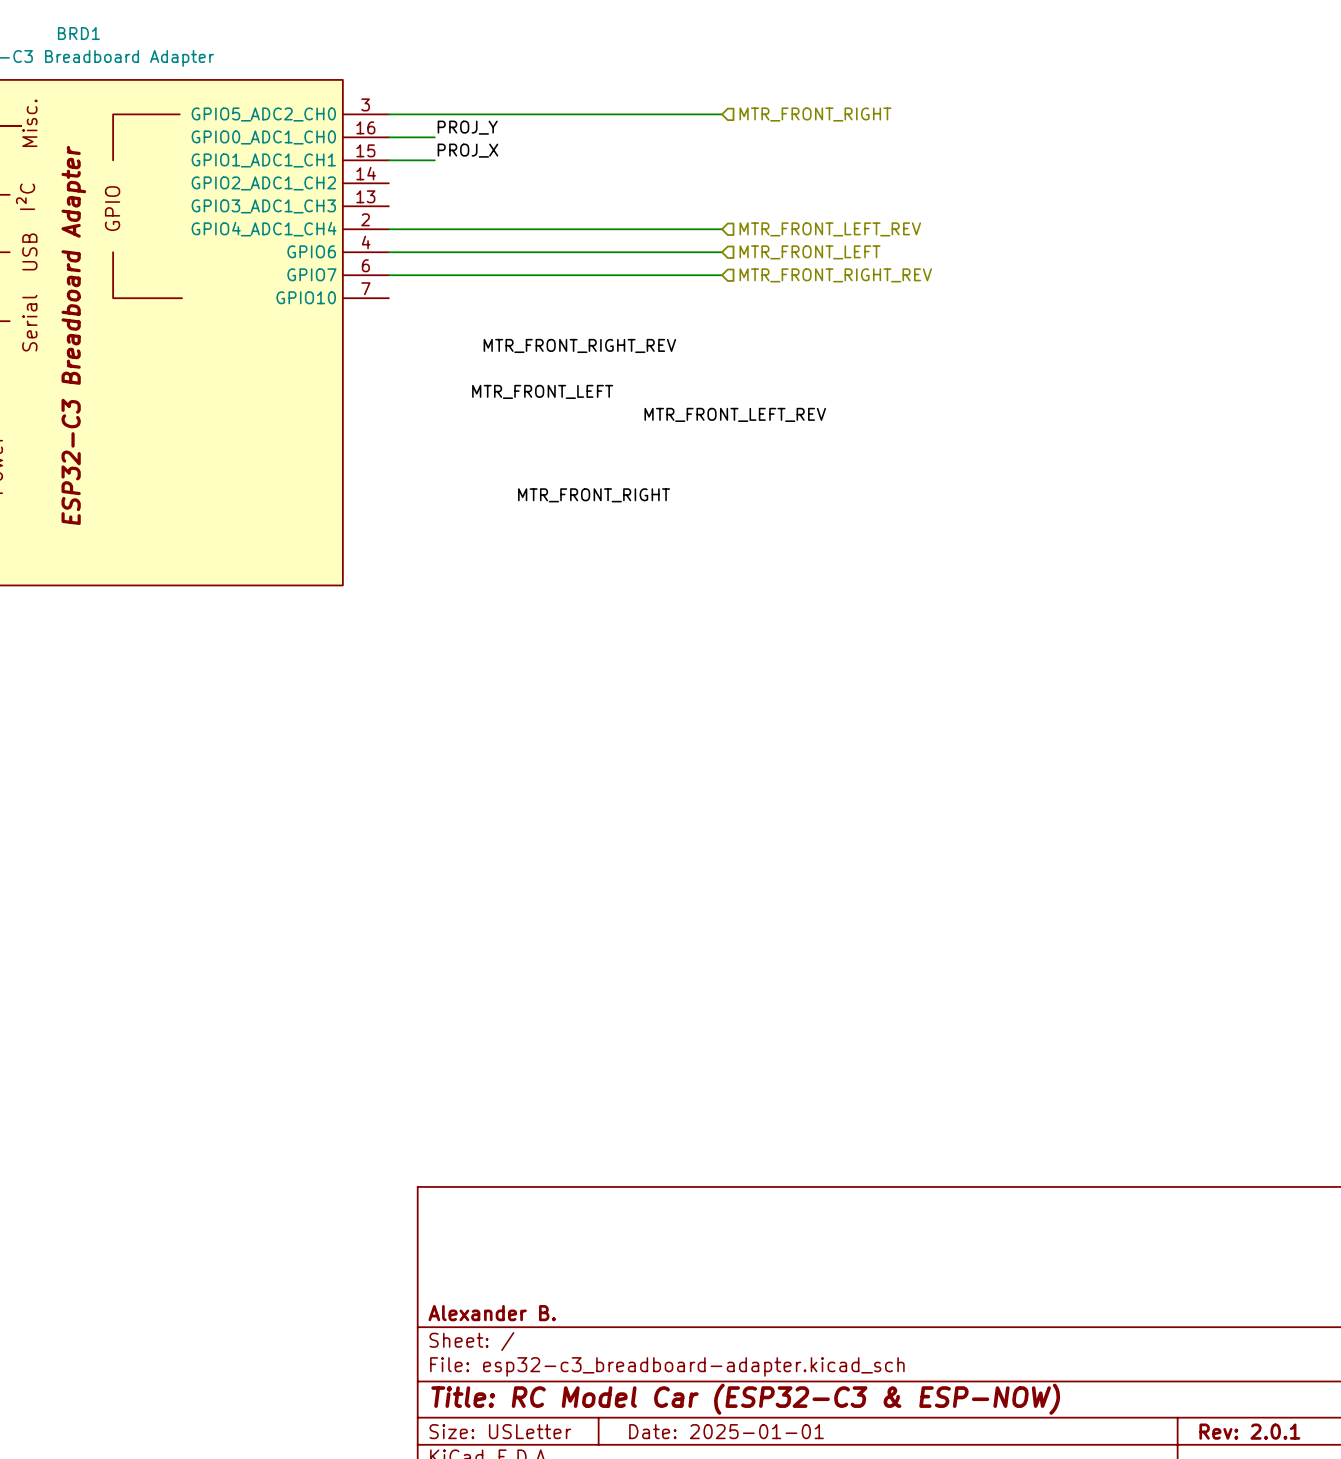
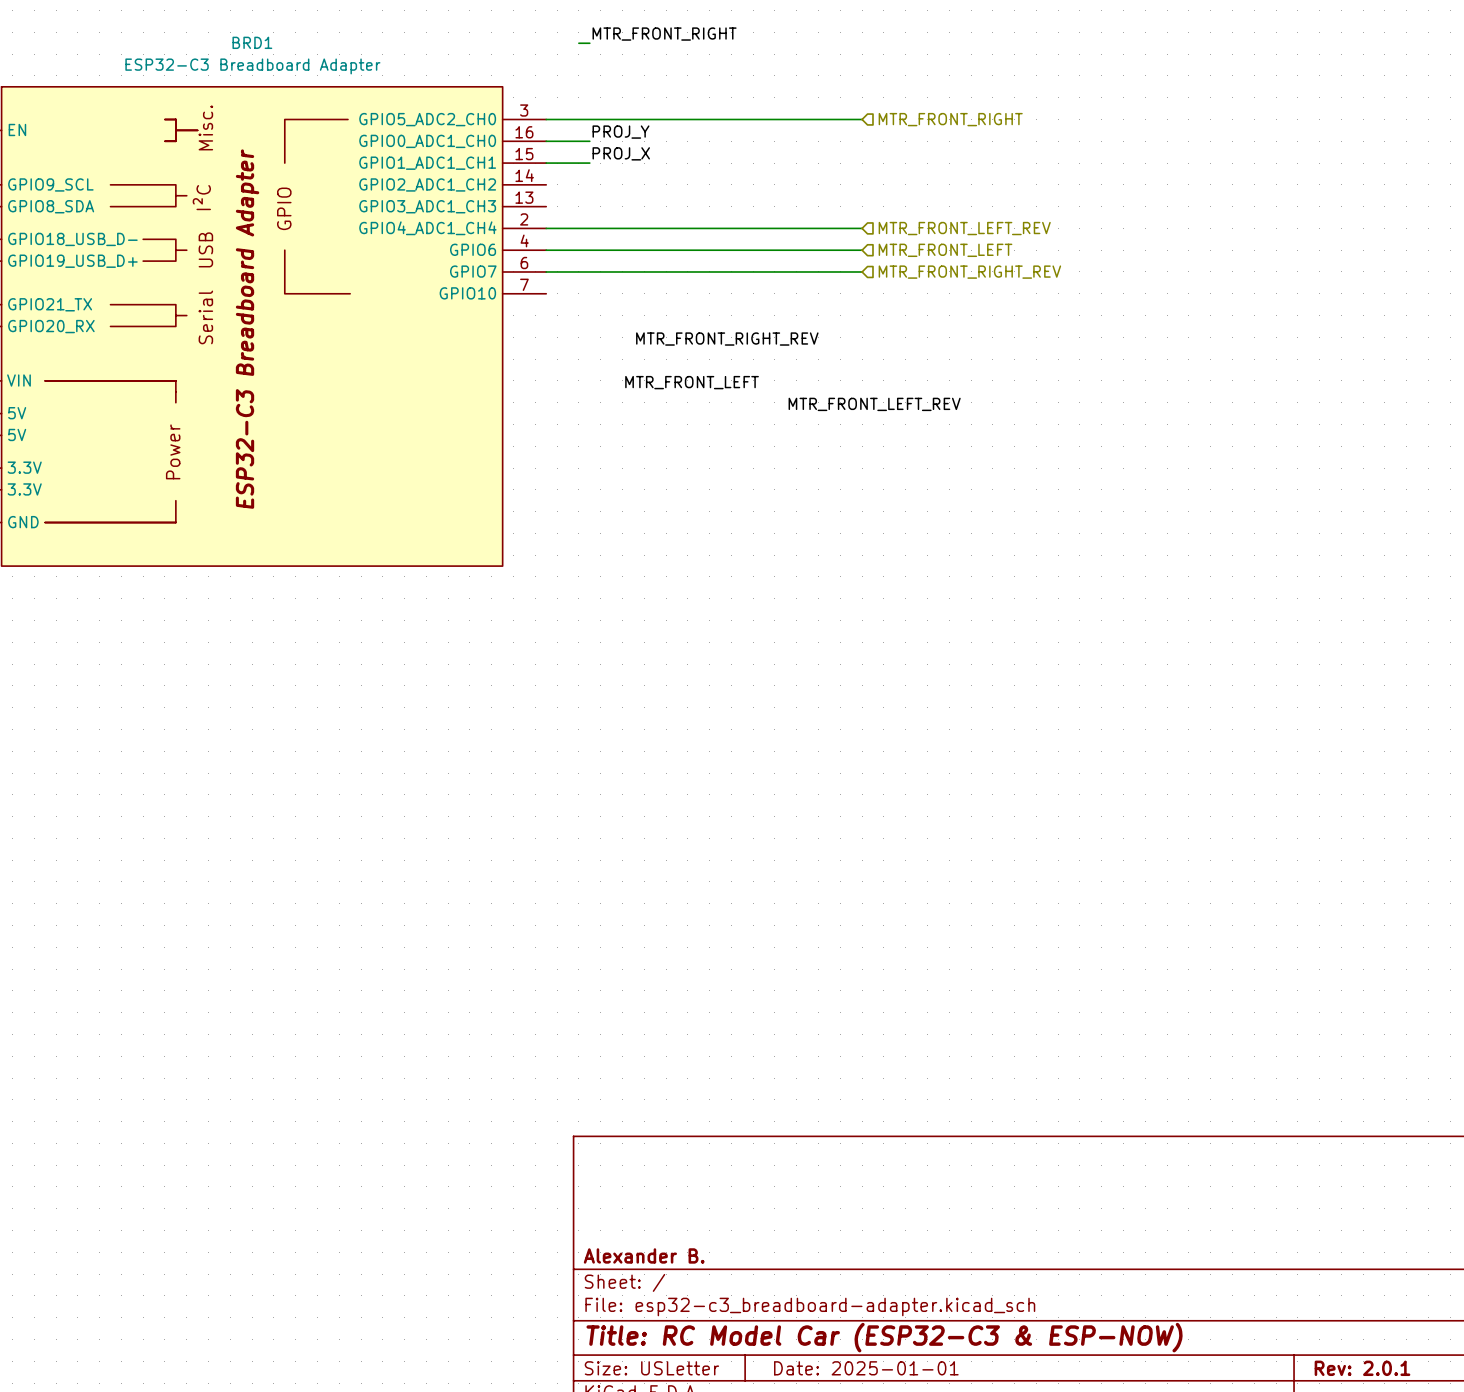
label: none -> MTR_FRONT_RIGHT (664, 34)
wire: none -> (578, 43) (589, 43)
label: MTR_FRONT_RIGHT (594, 495) -> none

